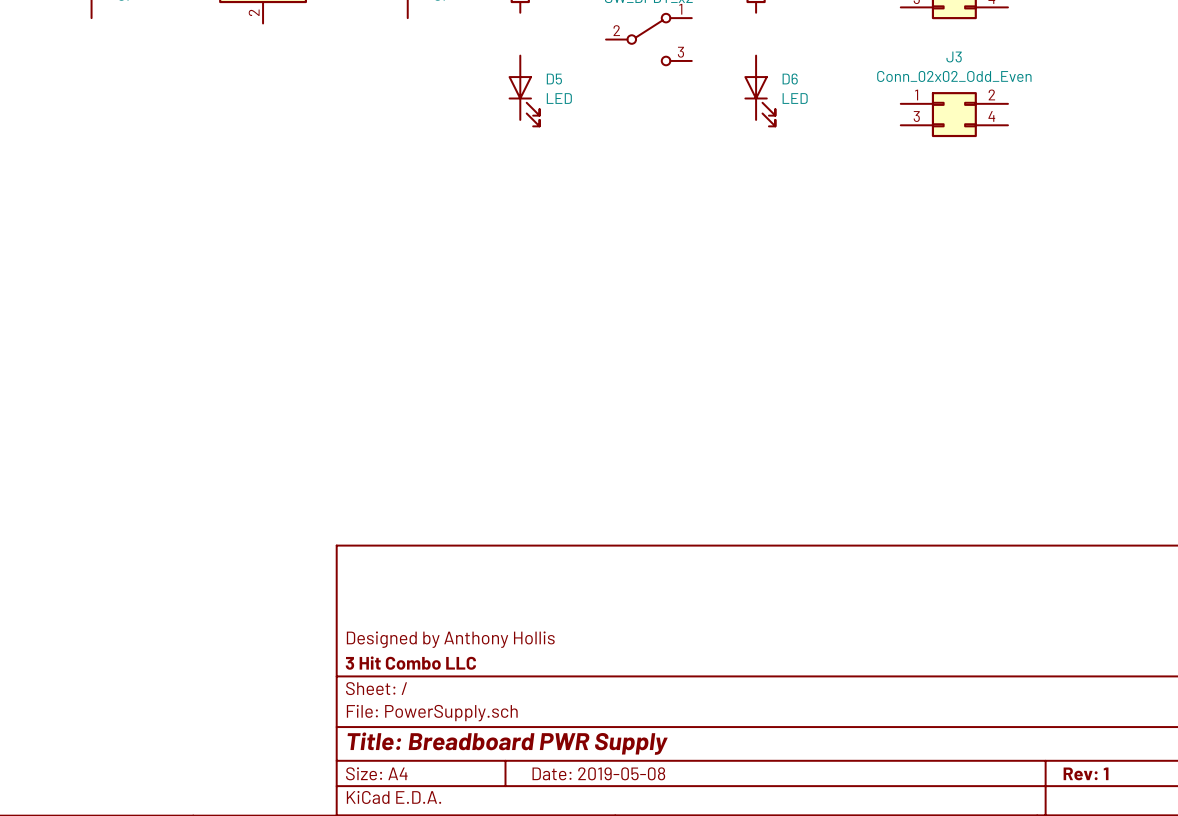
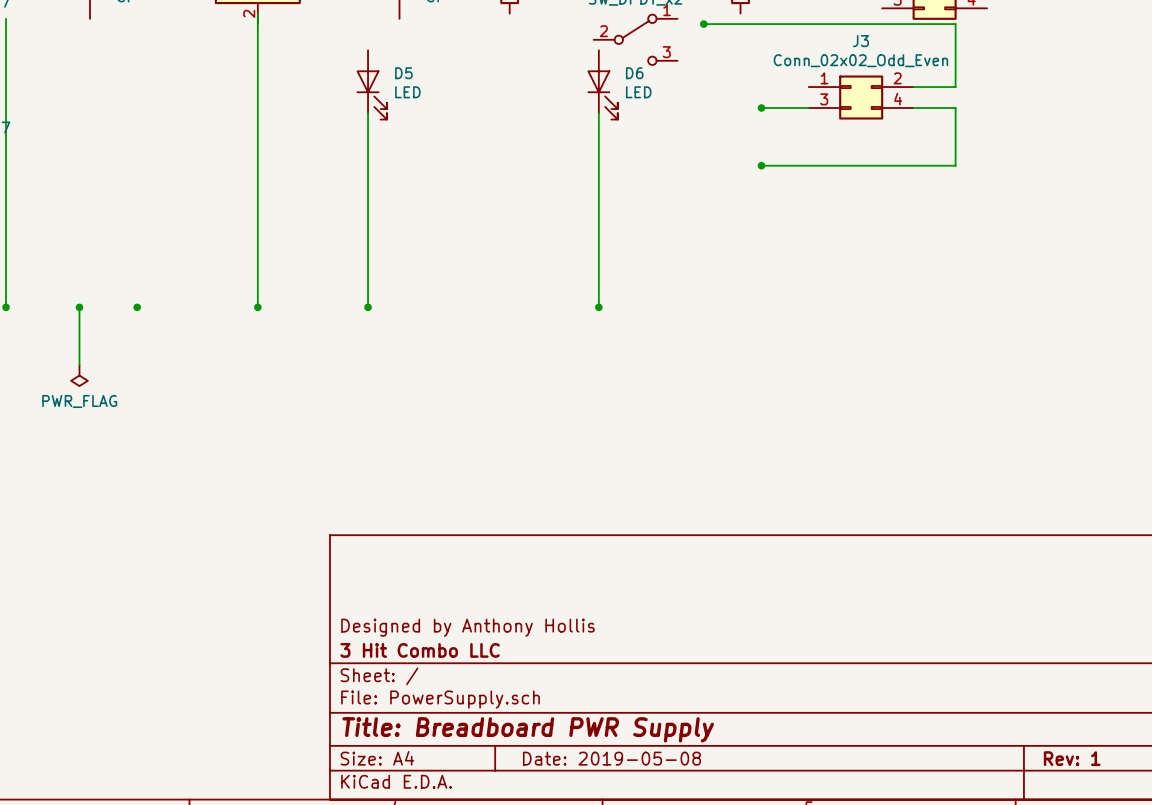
wire: none -> (257, 13) (257, 307)
wire: none -> (6, 18) (6, 307)
wire: none -> (703, 24) (955, 24) (955, 87) (913, 87)
junction: none -> (703, 24)
D5 position: (524, 90) -> (371, 84)
D6 position: (759, 90) -> (602, 84)
wire: none -> (761, 108) (808, 108)
junction: none -> (761, 108)
wire: none -> (913, 108) (955, 108) (955, 165) (761, 165)
wire: none -> (368, 113) (368, 307)
wire: none -> (598, 113) (598, 307)
J3 position: (954, 114) -> (861, 97)
junction: none -> (761, 165)
junction: none -> (6, 307)
wire: none -> (79, 307) (79, 365)
junction: none -> (79, 307)
junction: none -> (137, 307)
junction: none -> (257, 307)
junction: none -> (368, 307)
junction: none -> (598, 307)
power symbol: none -> PWR_FLAG (79, 375)

